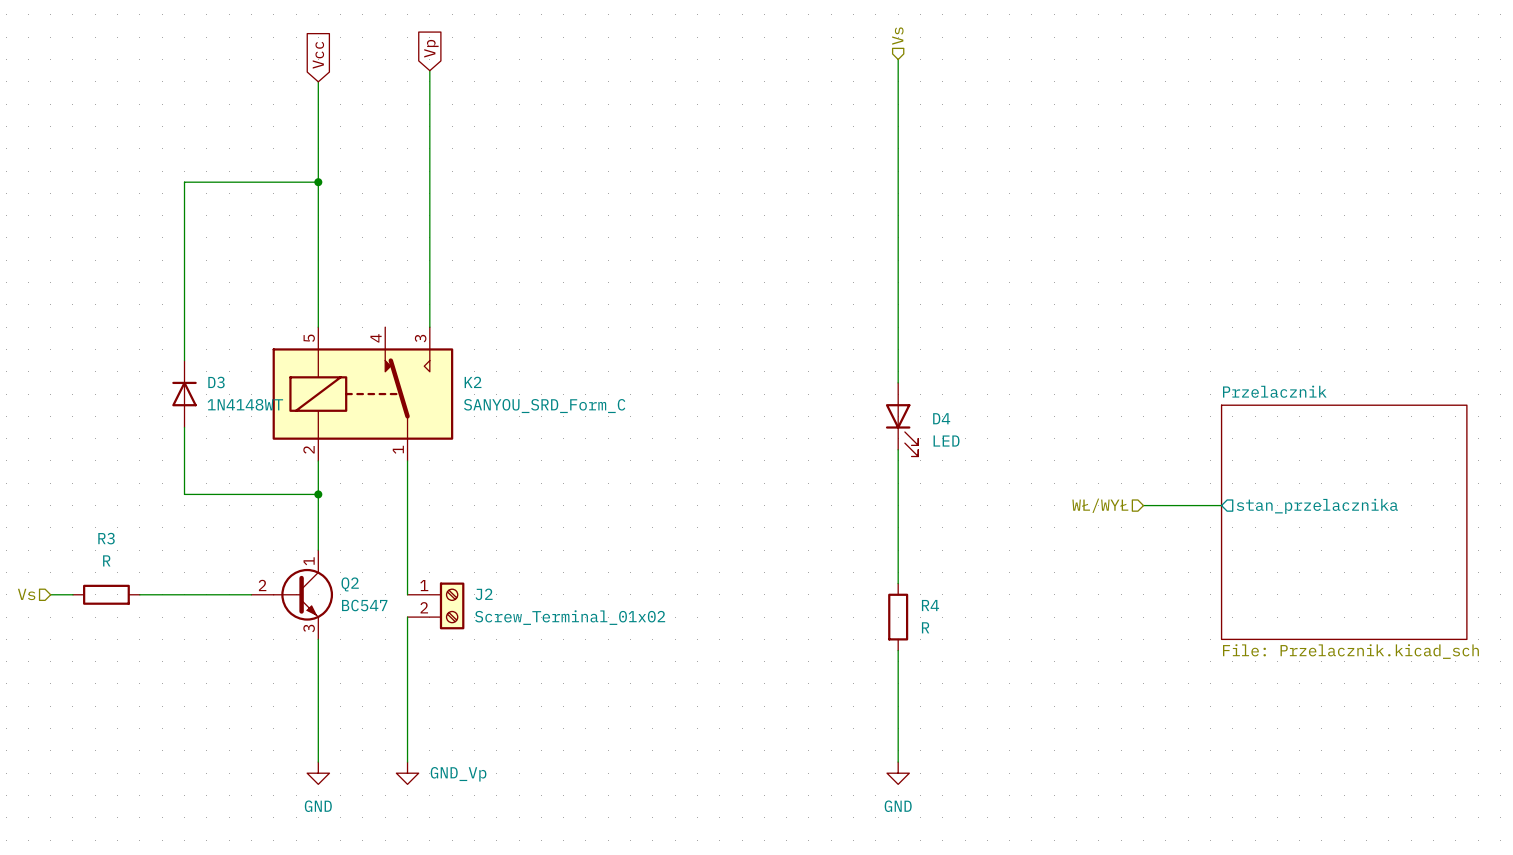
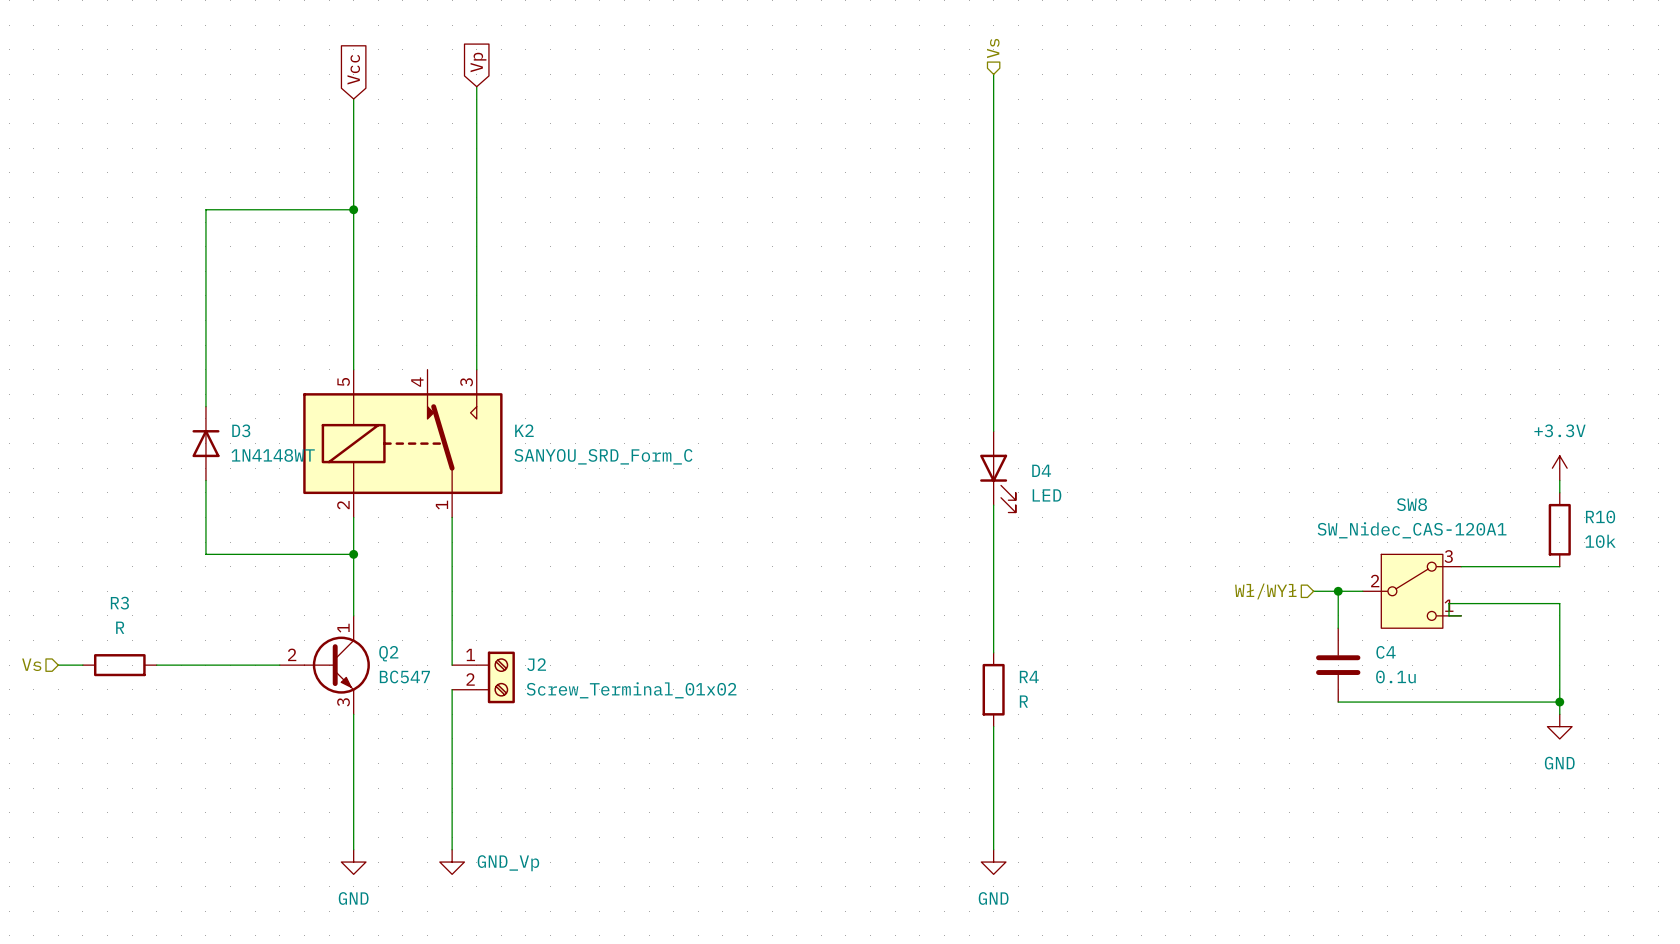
power symbol: none -> +3.3V (1559, 468)
wire: none -> (1559, 480) (1559, 492)
R10: none -> 10k (1559, 529)
hierarchical label: WŁ/WYŁ (1100, 505) -> Wł/WYł (1265, 591)
wire: (1143, 505) (1221, 505) -> none
wire: none -> (1461, 566) (1559, 566)
sheet pin: stan_przelacznika (1317, 506) -> none
sheet Przelacznik: File: Przelacznik.kicad_sch (1344, 522) -> none
wire: none -> (1313, 591) (1362, 591)
wire: none -> (1338, 591) (1338, 628)
junction: none -> (1338, 591)
SW8: none -> SW_Nidec_CAS-120A1 (1412, 591)
wire: none -> (1461, 615) (1448, 615) (1448, 603) (1559, 603) (1559, 714)
C4: none -> 0.1u (1338, 665)
wire: none -> (1338, 702) (1559, 702)
junction: none -> (1559, 702)
power symbol: none -> GND (1559, 726)

